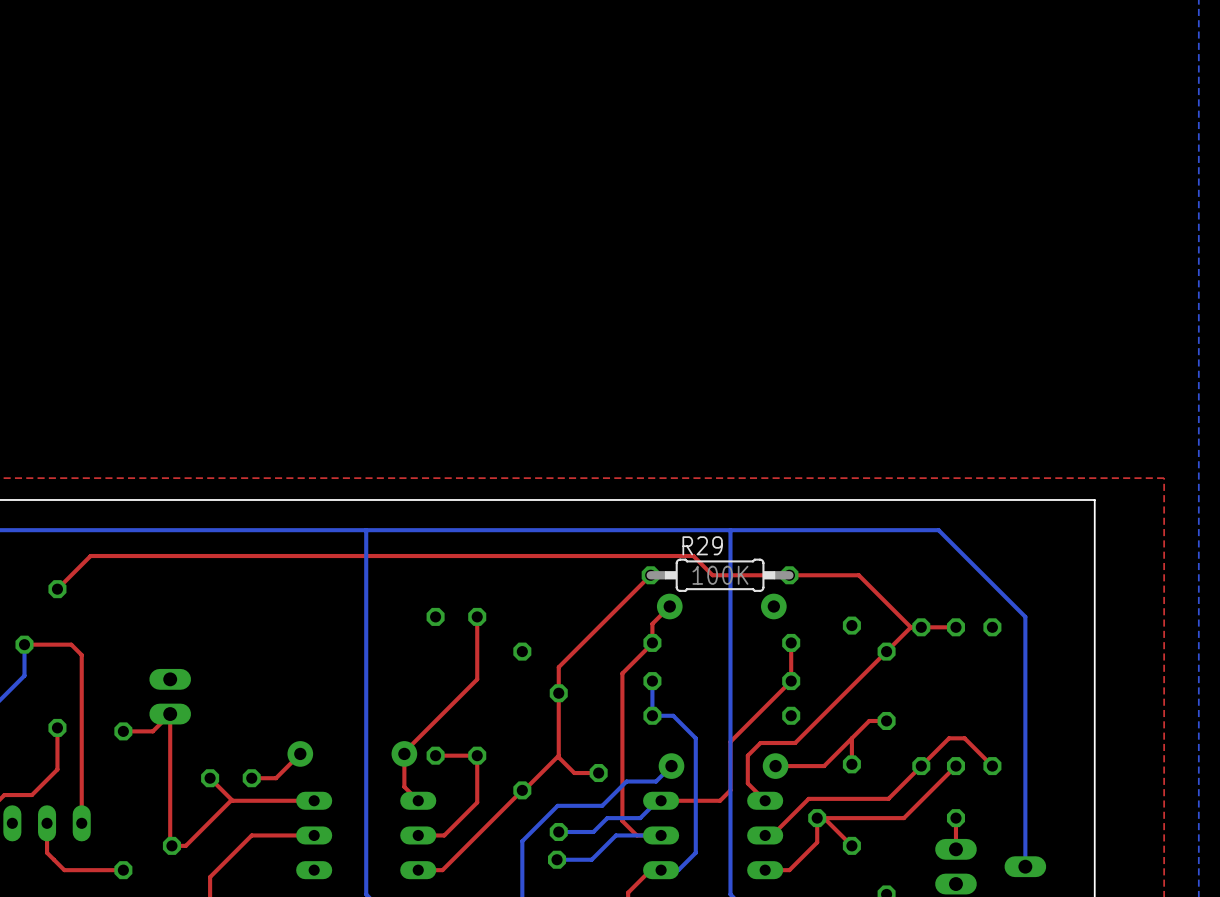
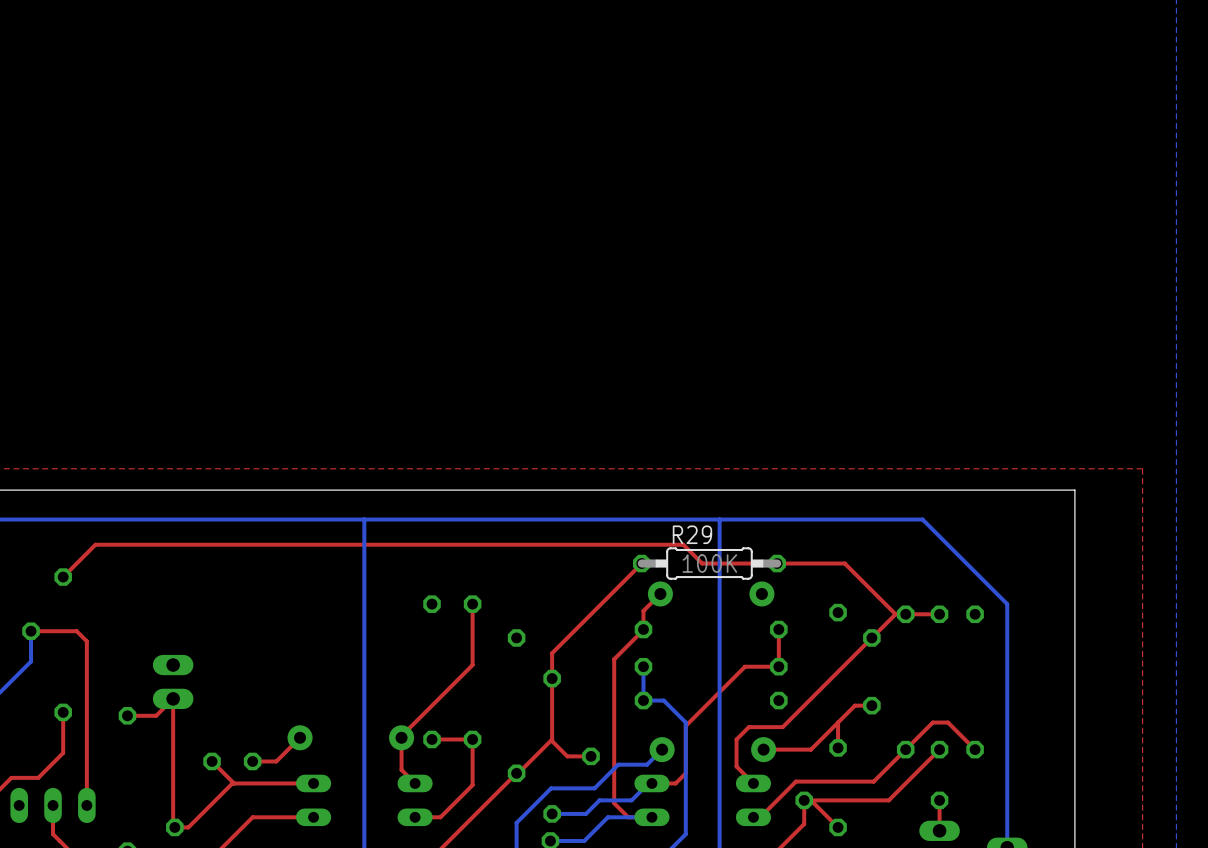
top track: (791, 681) (730, 741) (730, 790) (720, 800) (685, 800) -> (778, 666) (745, 666) (685, 725) (685, 773) (675, 783)

